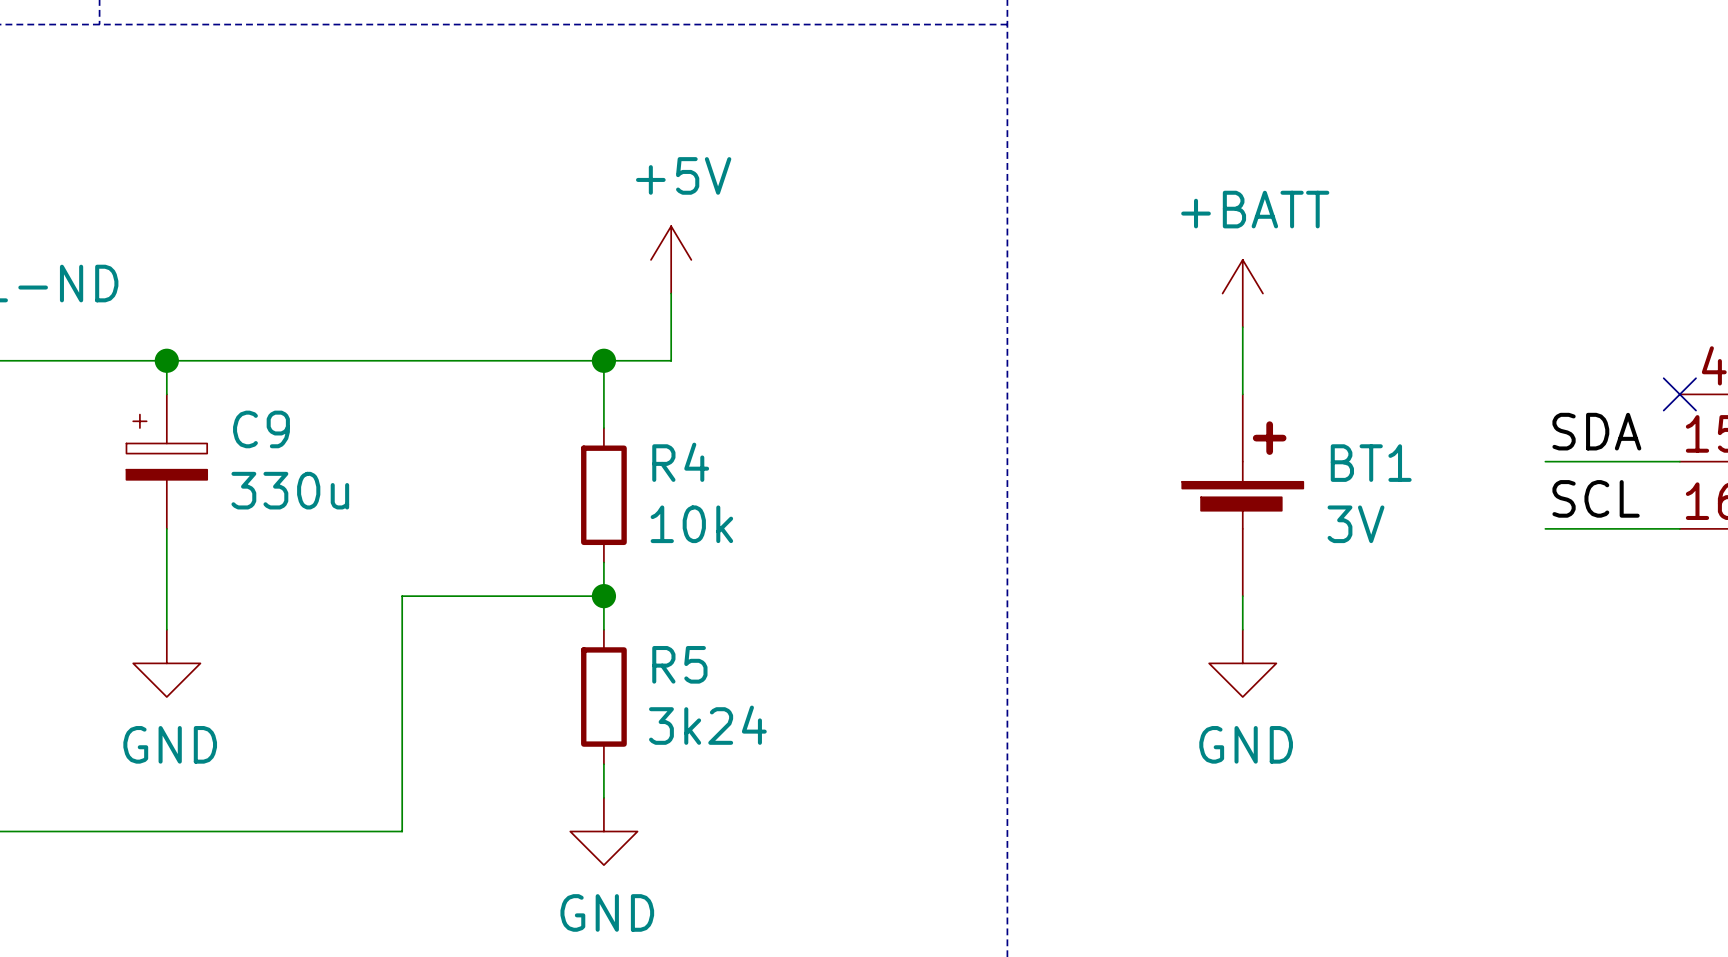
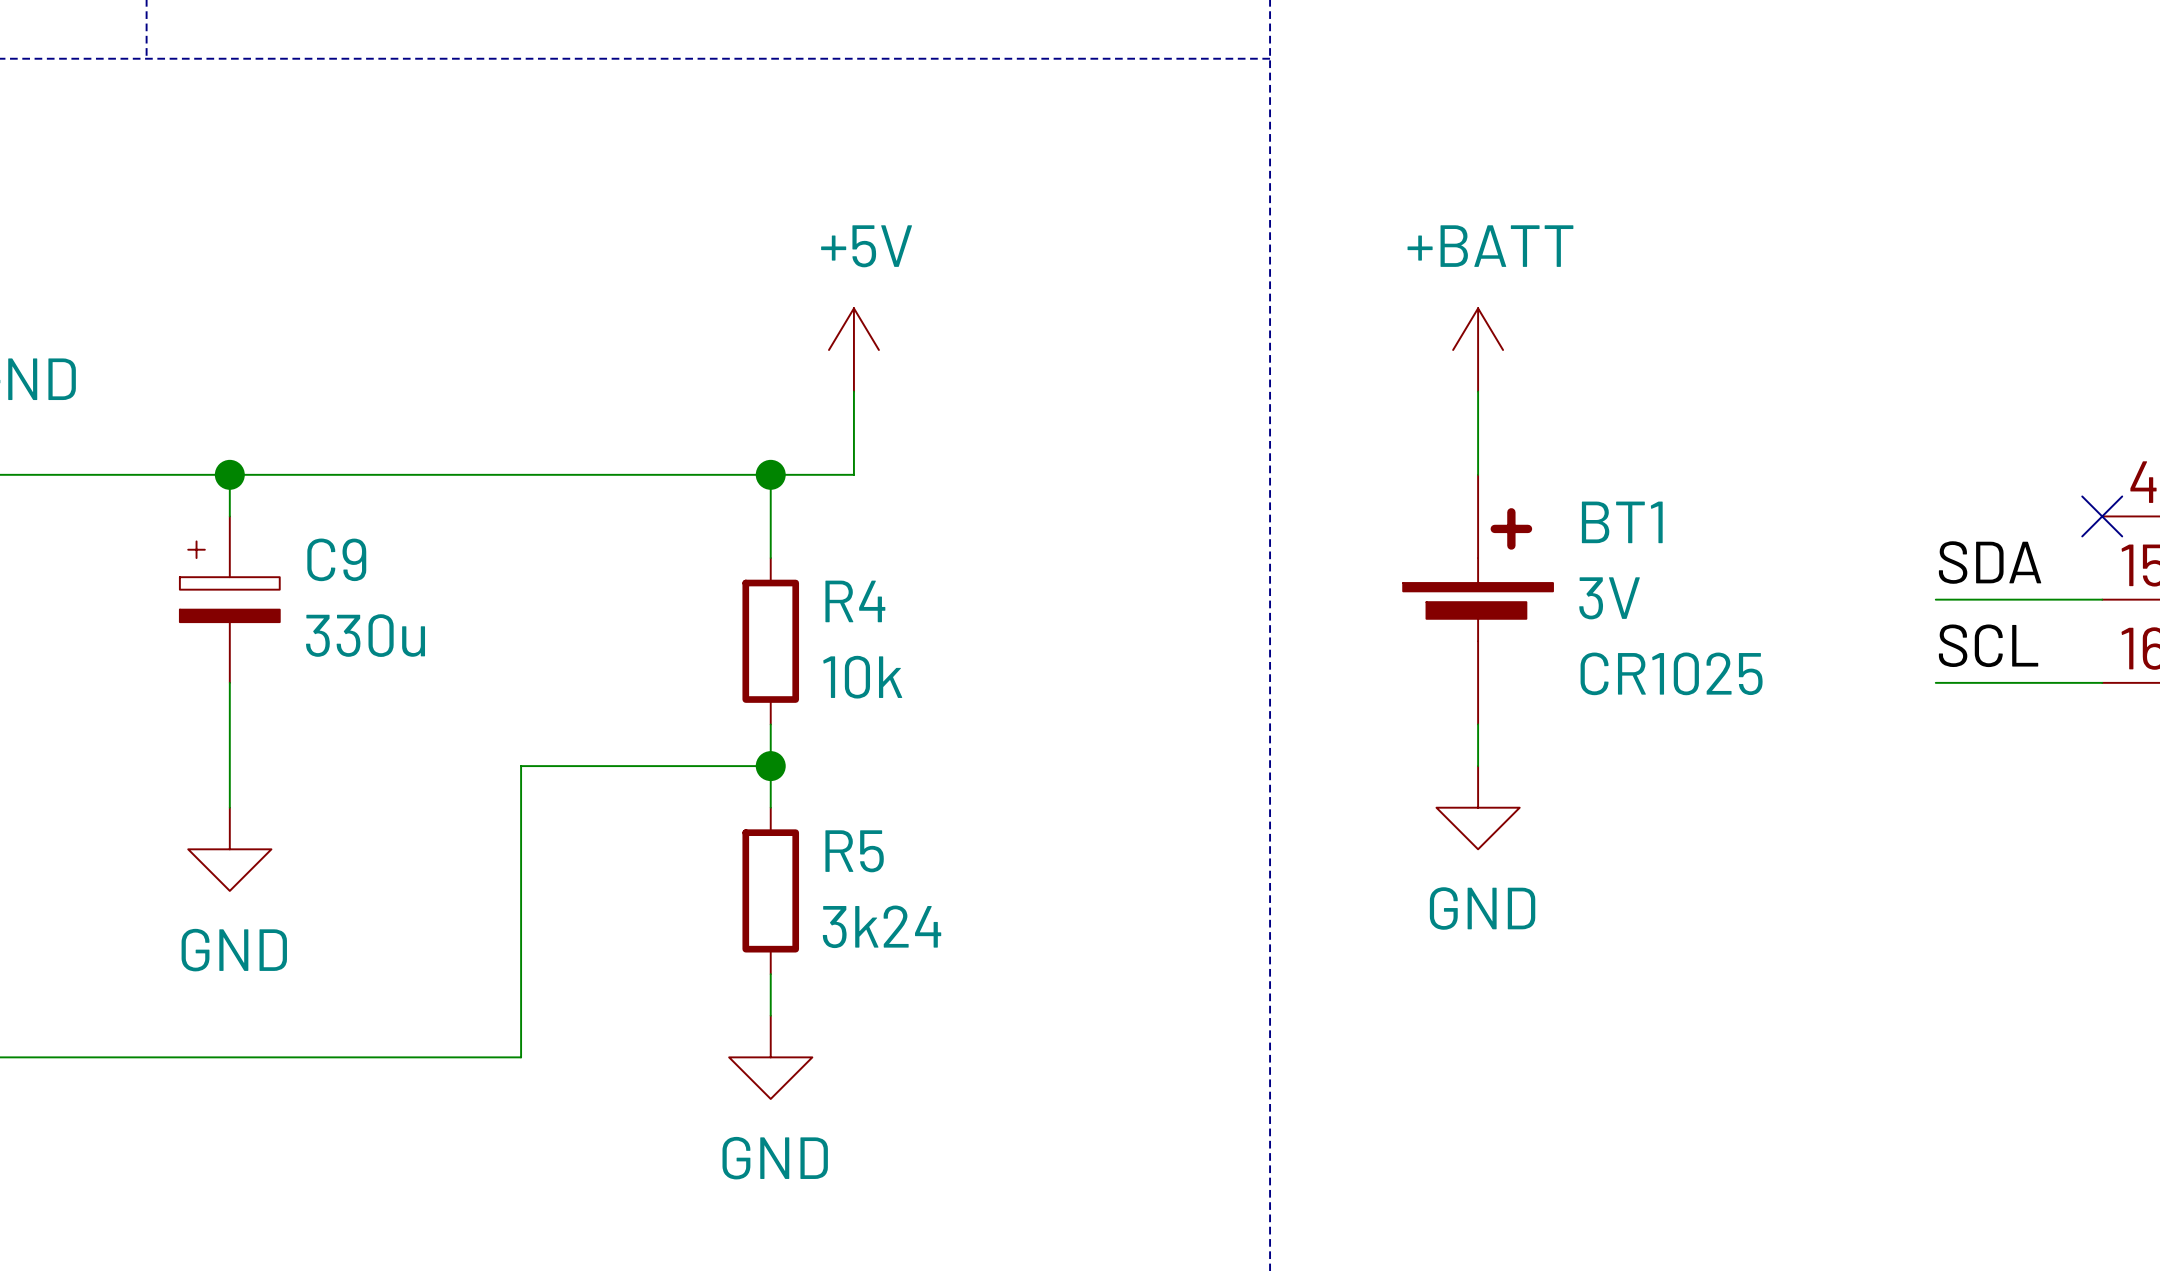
power symbol position: +BATT (1242, 293) -> +BATT (1478, 350)
wire: (1242, 327) (1242, 394) -> (1478, 391) (1478, 474)
BT1 name position: BT1 (1371, 463) -> BT1 (1622, 522)
BT1 position: (1242, 495) -> (1478, 599)
BT1 text: none -> CR1025 (1671, 673)
BT1 value position: 3V (1355, 524) -> 3V (1609, 598)
wire: (1242, 596) (1242, 629) -> (1478, 724) (1478, 766)
power symbol position: GND (1242, 663) -> GND (1478, 807)

